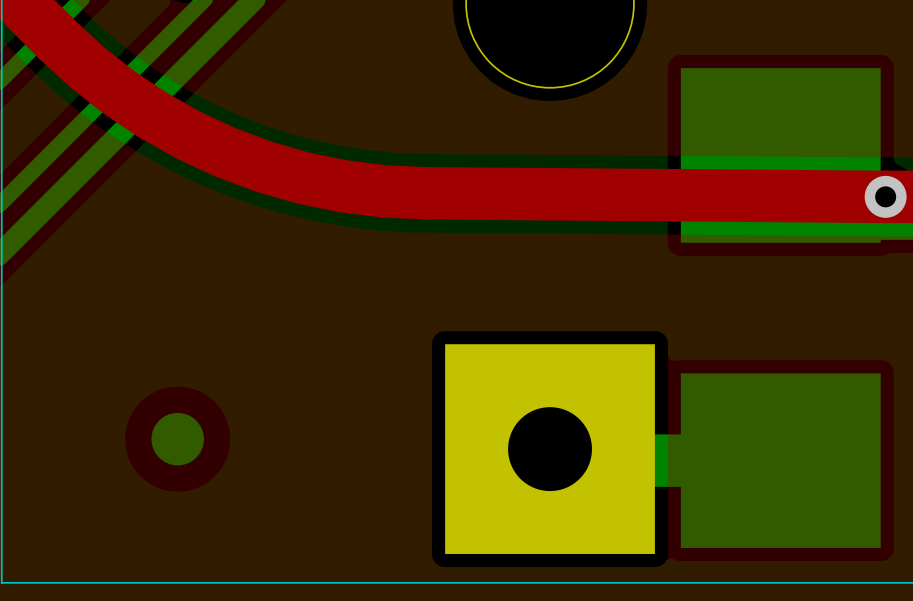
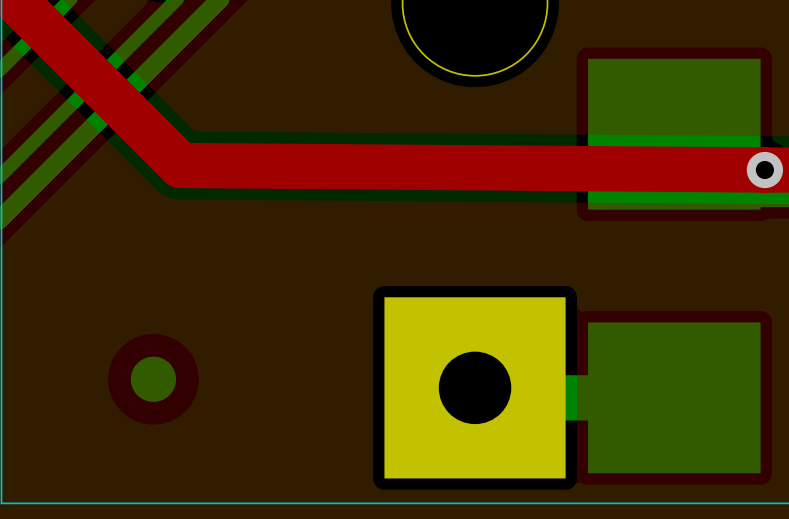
top track: (56, 38) (86, 66) (118, 92) (152, 115) (188, 135) (225, 152) (263, 166) (303, 178) (343, 186) (384, 191) (425, 193) -> (48, 33) (180, 165) (367, 166)

